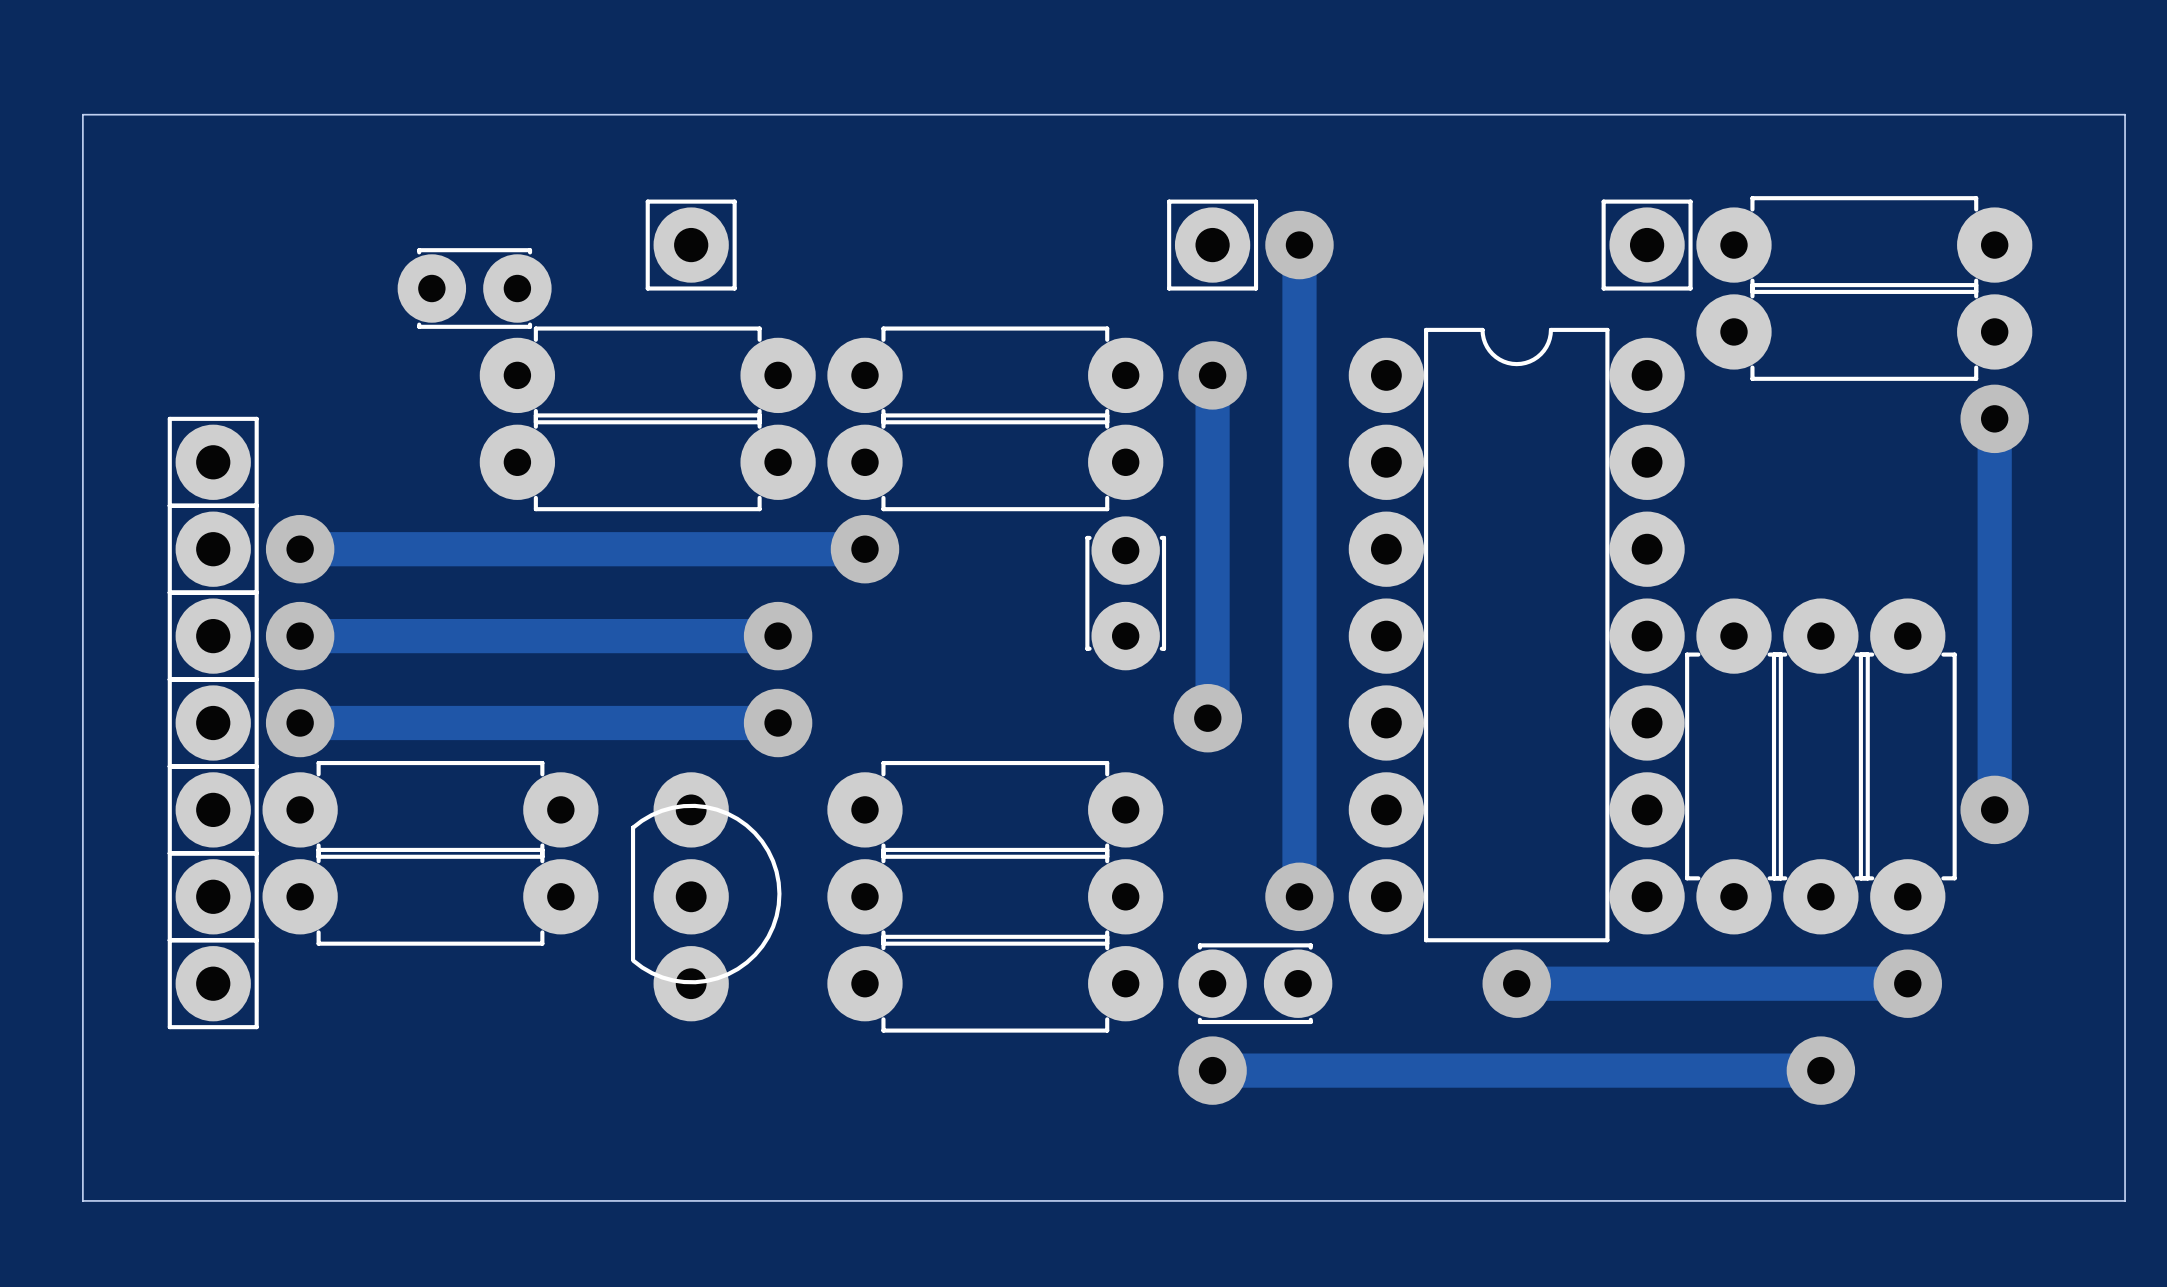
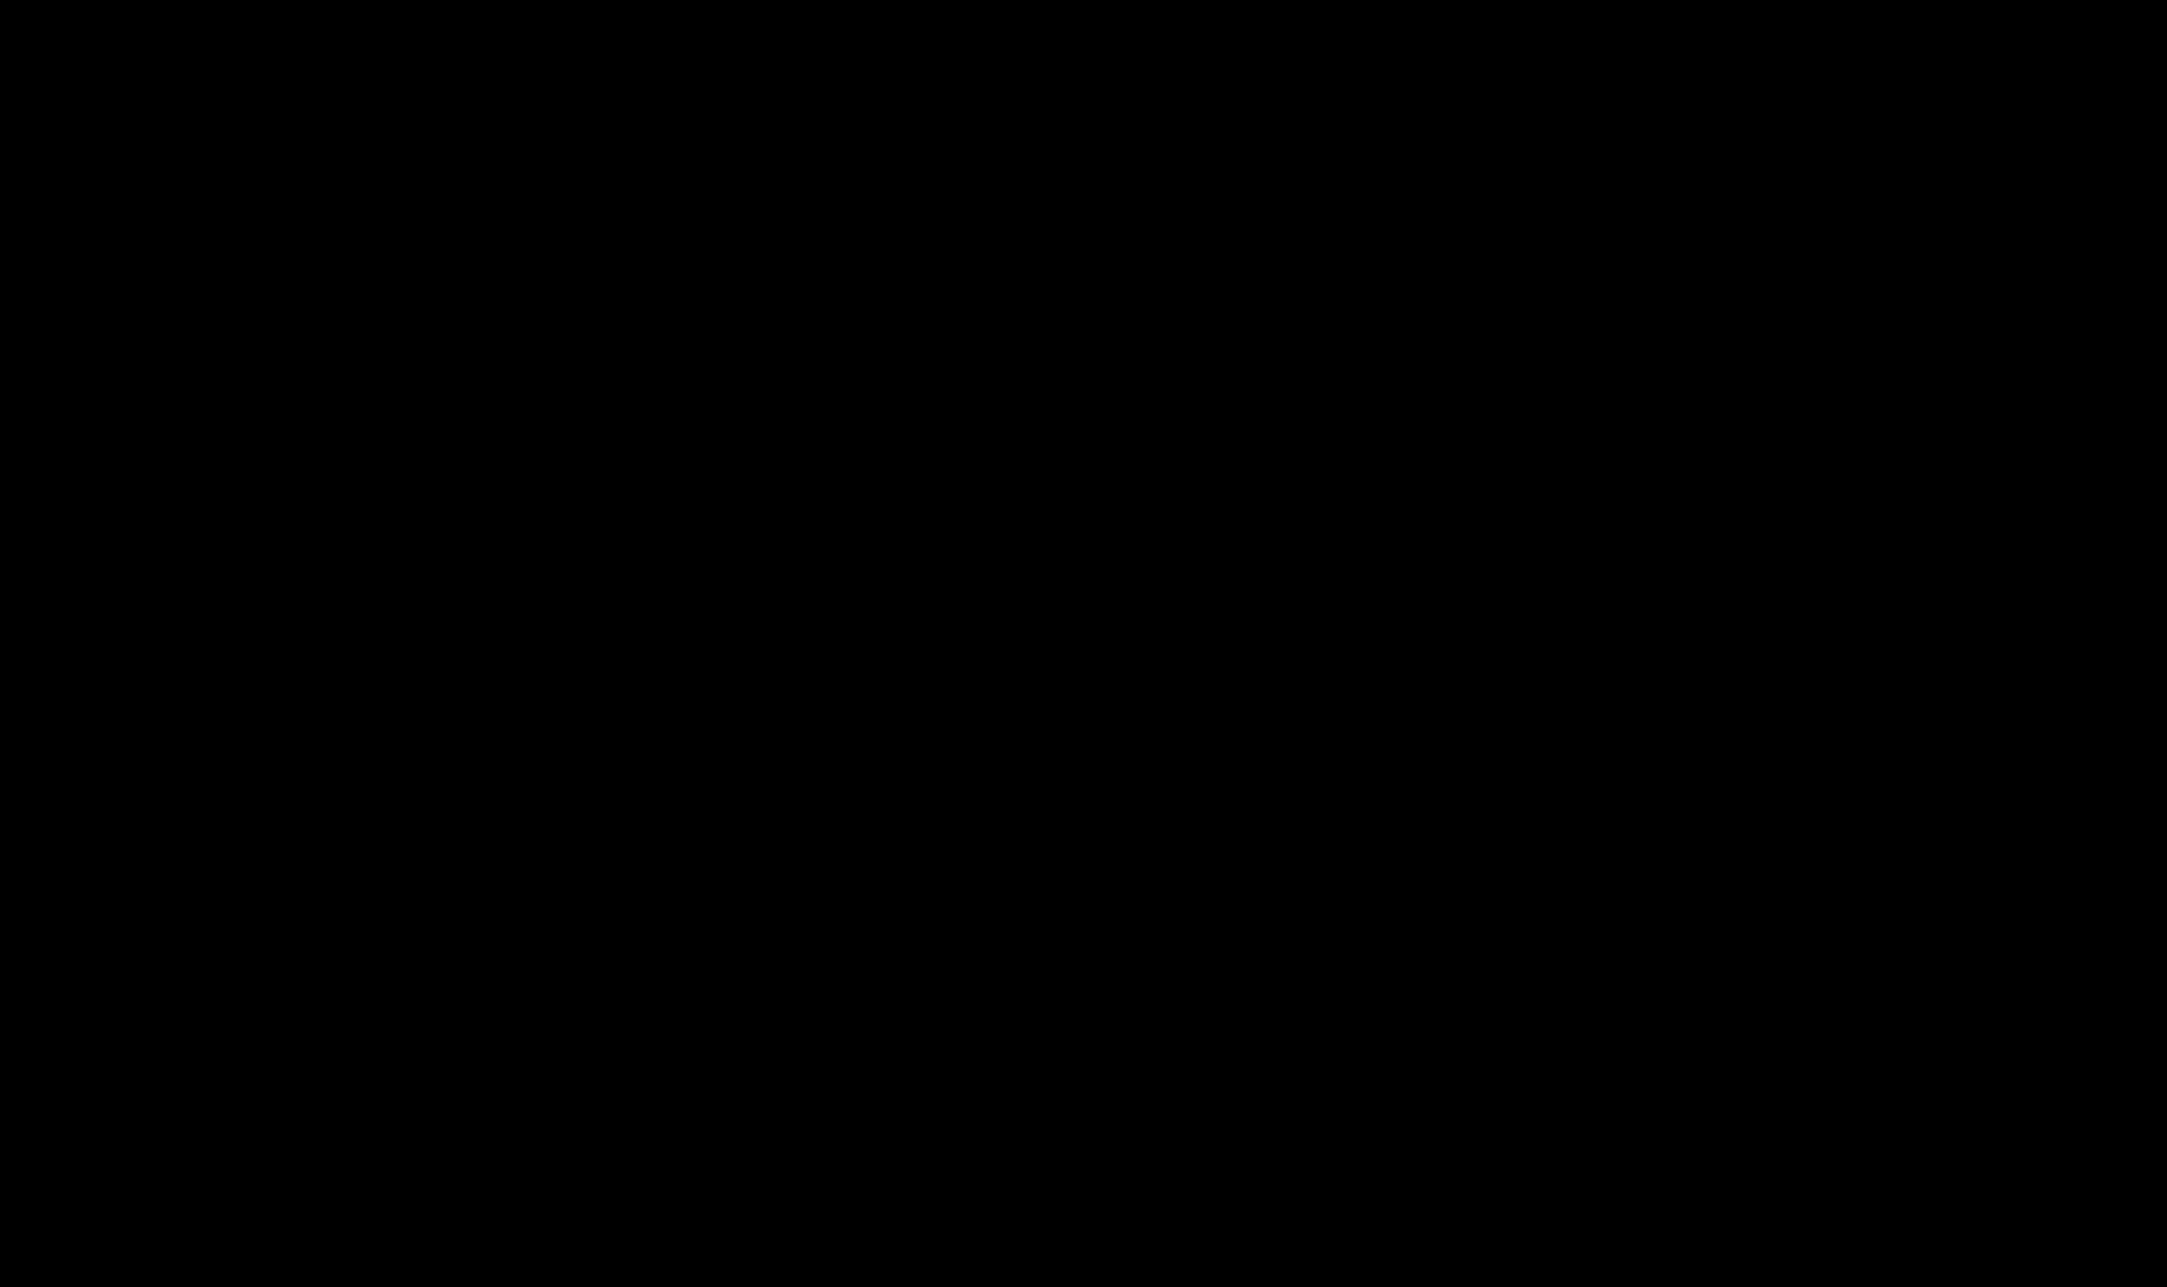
board edge: (82, 114) (2125, 114) (2125, 1200) (82, 1200) (82, 114) -> none
part: (691, 245) -> none
part: (1212, 245) -> none
track: (1299, 245) (1299, 896) -> none
via: (1299, 245) -> none
part: (1647, 245) -> none
part: (1864, 245) -> none
part: (474, 288) -> none
part: (1864, 331) -> none
part: (647, 375) -> none
part: (995, 375) -> none
track: (1212, 375) (1212, 713) (1207, 718) -> none
via: (1212, 375) -> none
track: (1994, 418) (1994, 809) -> none
via: (1994, 418) -> none
part: (213, 462) -> none
part: (647, 462) -> none
part: (995, 462) -> none
part: (213, 549) -> none
track: (300, 549) (864, 549) -> none
via: (300, 549) -> none
via: (864, 549) -> none
part: (1125, 593) -> none
part: (1516, 635) -> none
part: (213, 636) -> none
track: (300, 636) (778, 636) -> none
via: (300, 636) -> none
via: (778, 636) -> none
via: (1207, 718) -> none
part: (213, 723) -> none
track: (300, 723) (778, 723) -> none
via: (300, 723) -> none
via: (778, 723) -> none
part: (1733, 766) -> none
part: (1820, 766) -> none
part: (1907, 766) -> none
part: (213, 809) -> none
part: (430, 809) -> none
part: (995, 809) -> none
via: (1994, 809) -> none
part: (213, 896) -> none
part: (430, 896) -> none
part: (706, 896) -> none
part: (995, 896) -> none
via: (1299, 896) -> none
part: (213, 983) -> none
part: (995, 983) -> none
part: (1255, 983) -> none
track: (1516, 983) (1907, 983) -> none
via: (1516, 983) -> none
via: (1907, 983) -> none
track: (1212, 1070) (1820, 1070) -> none
via: (1212, 1070) -> none
via: (1820, 1070) -> none

